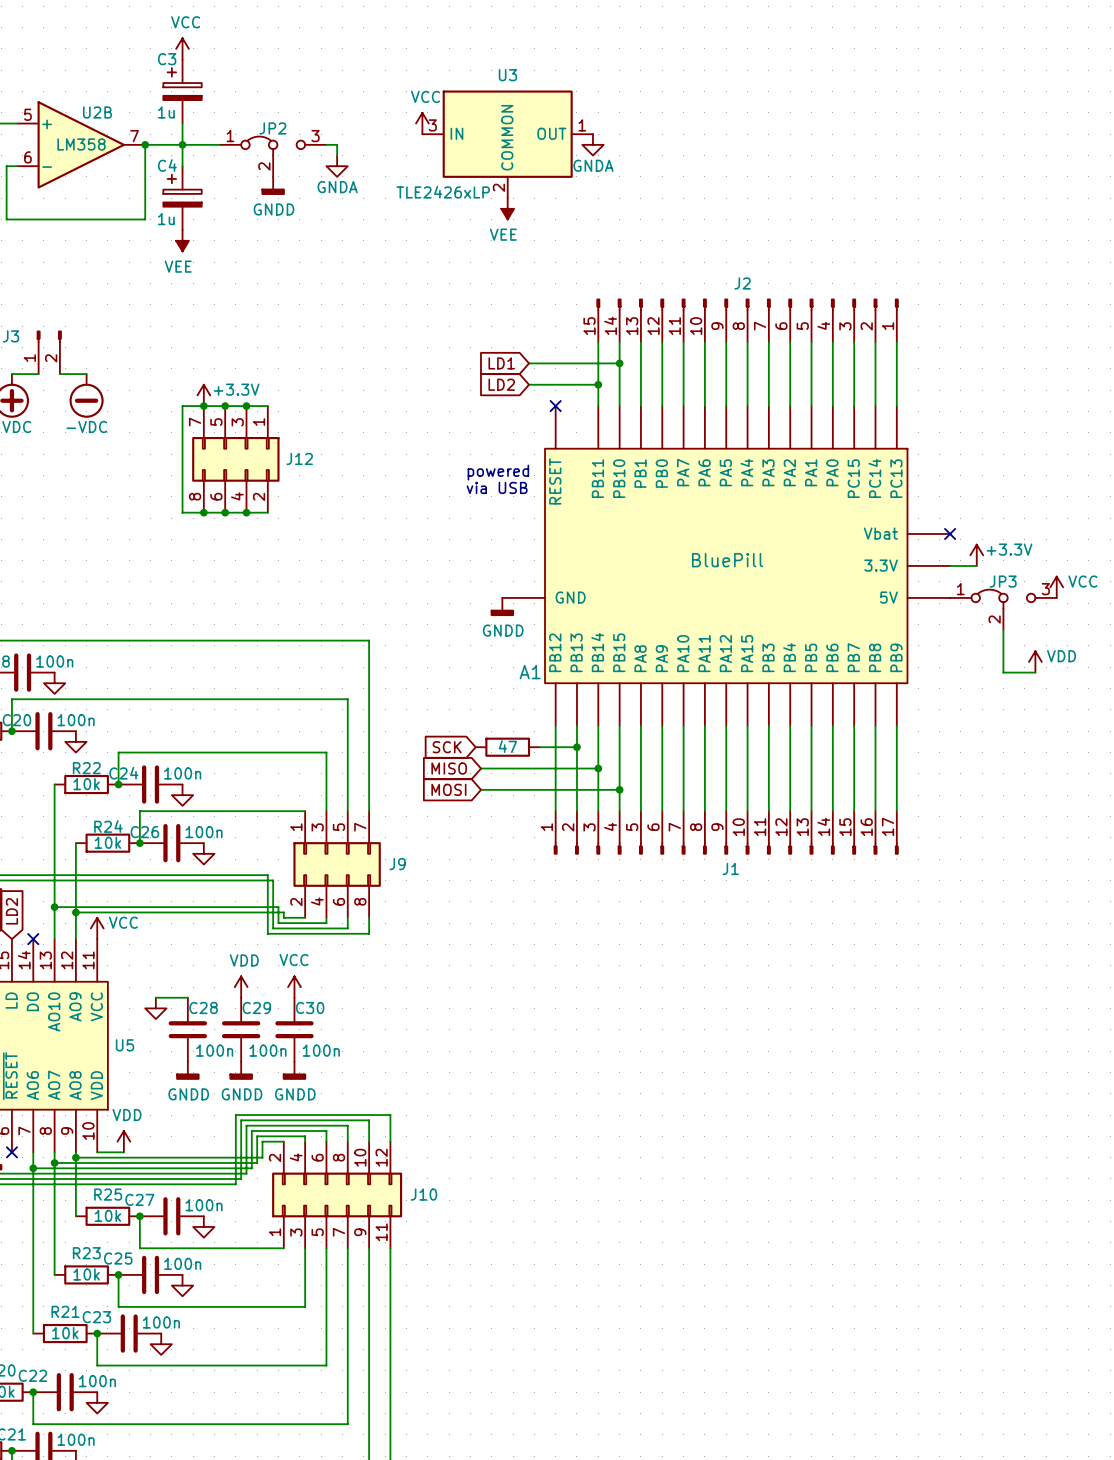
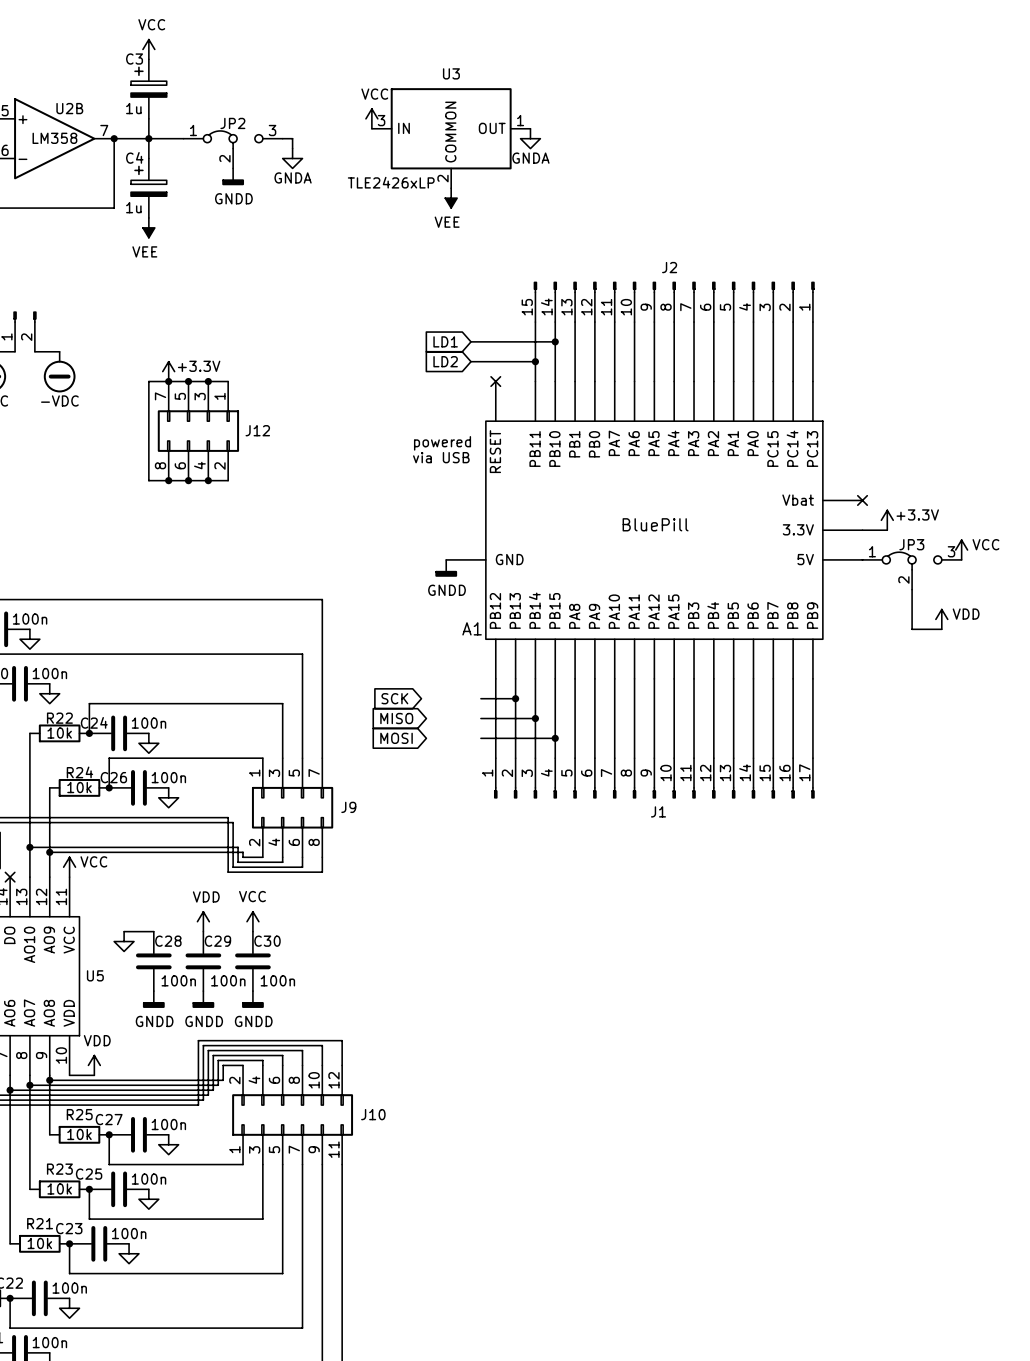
part: 47 (507, 747) -> none
wire: (481, 768) (539, 768) -> none
wire: (481, 789) (539, 789) -> none

